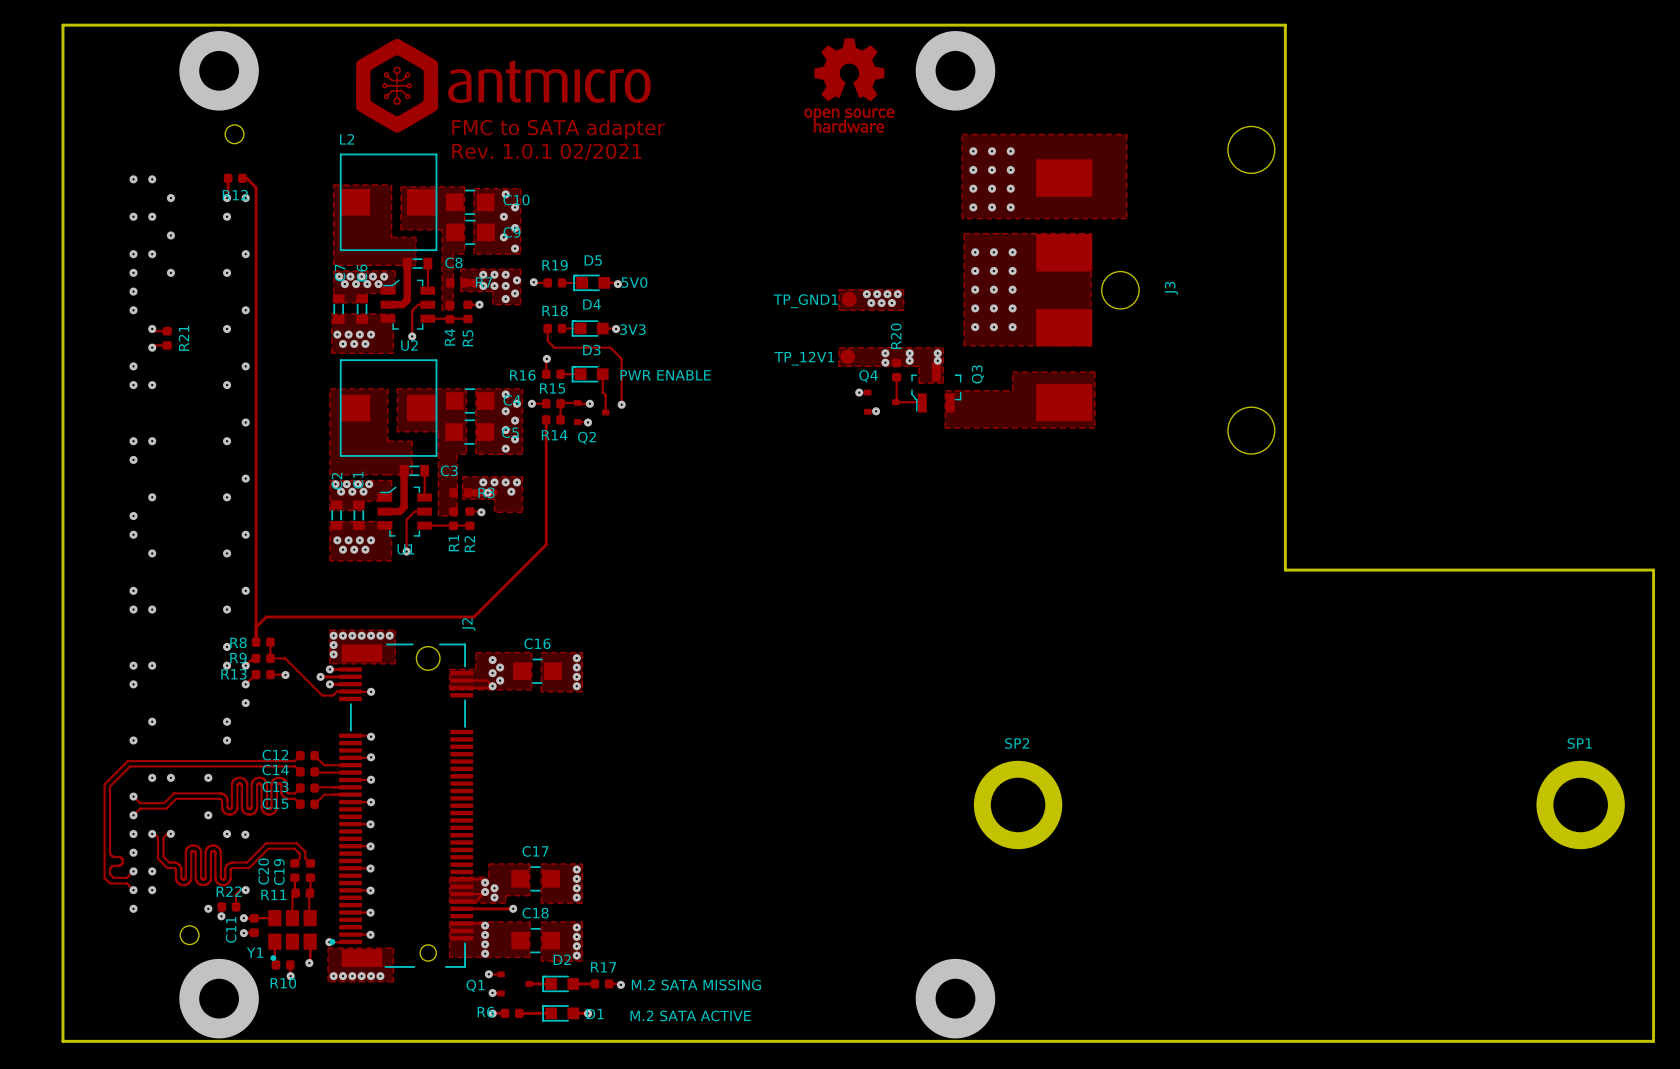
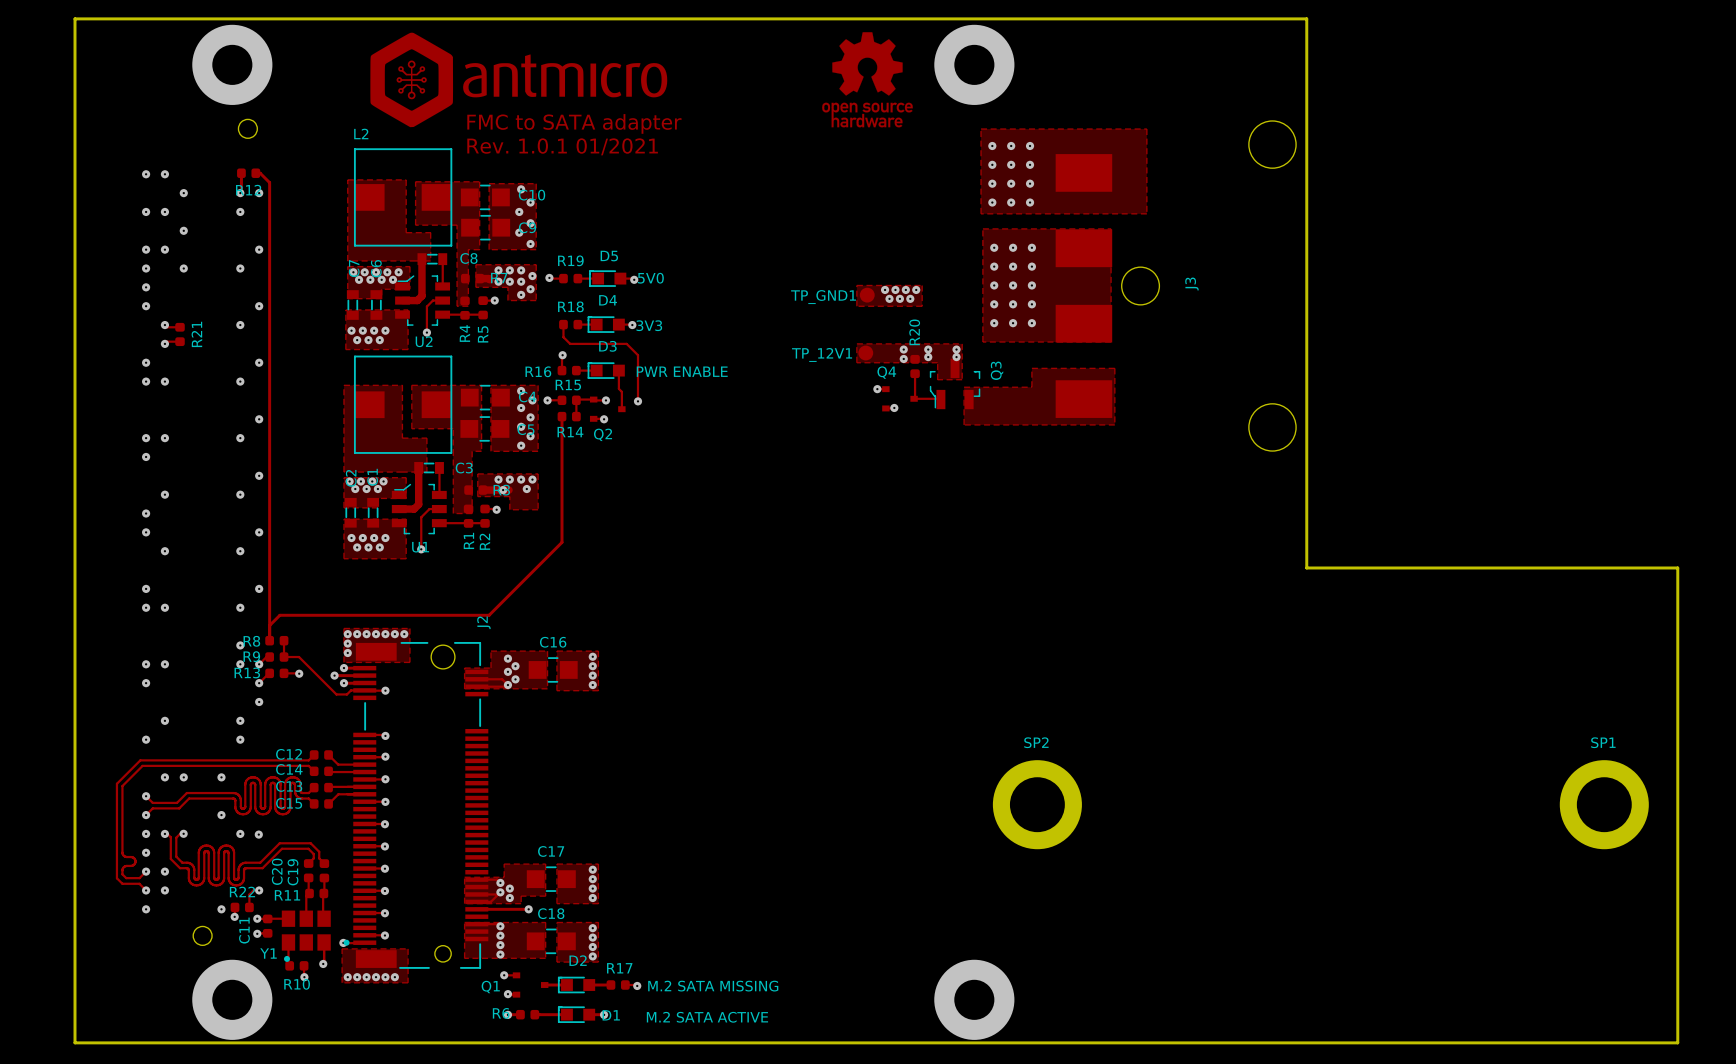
text: Rev. 1.0.1 02/2021 (546, 152) -> Rev. 1.0.1 01/2021 (562, 146)

